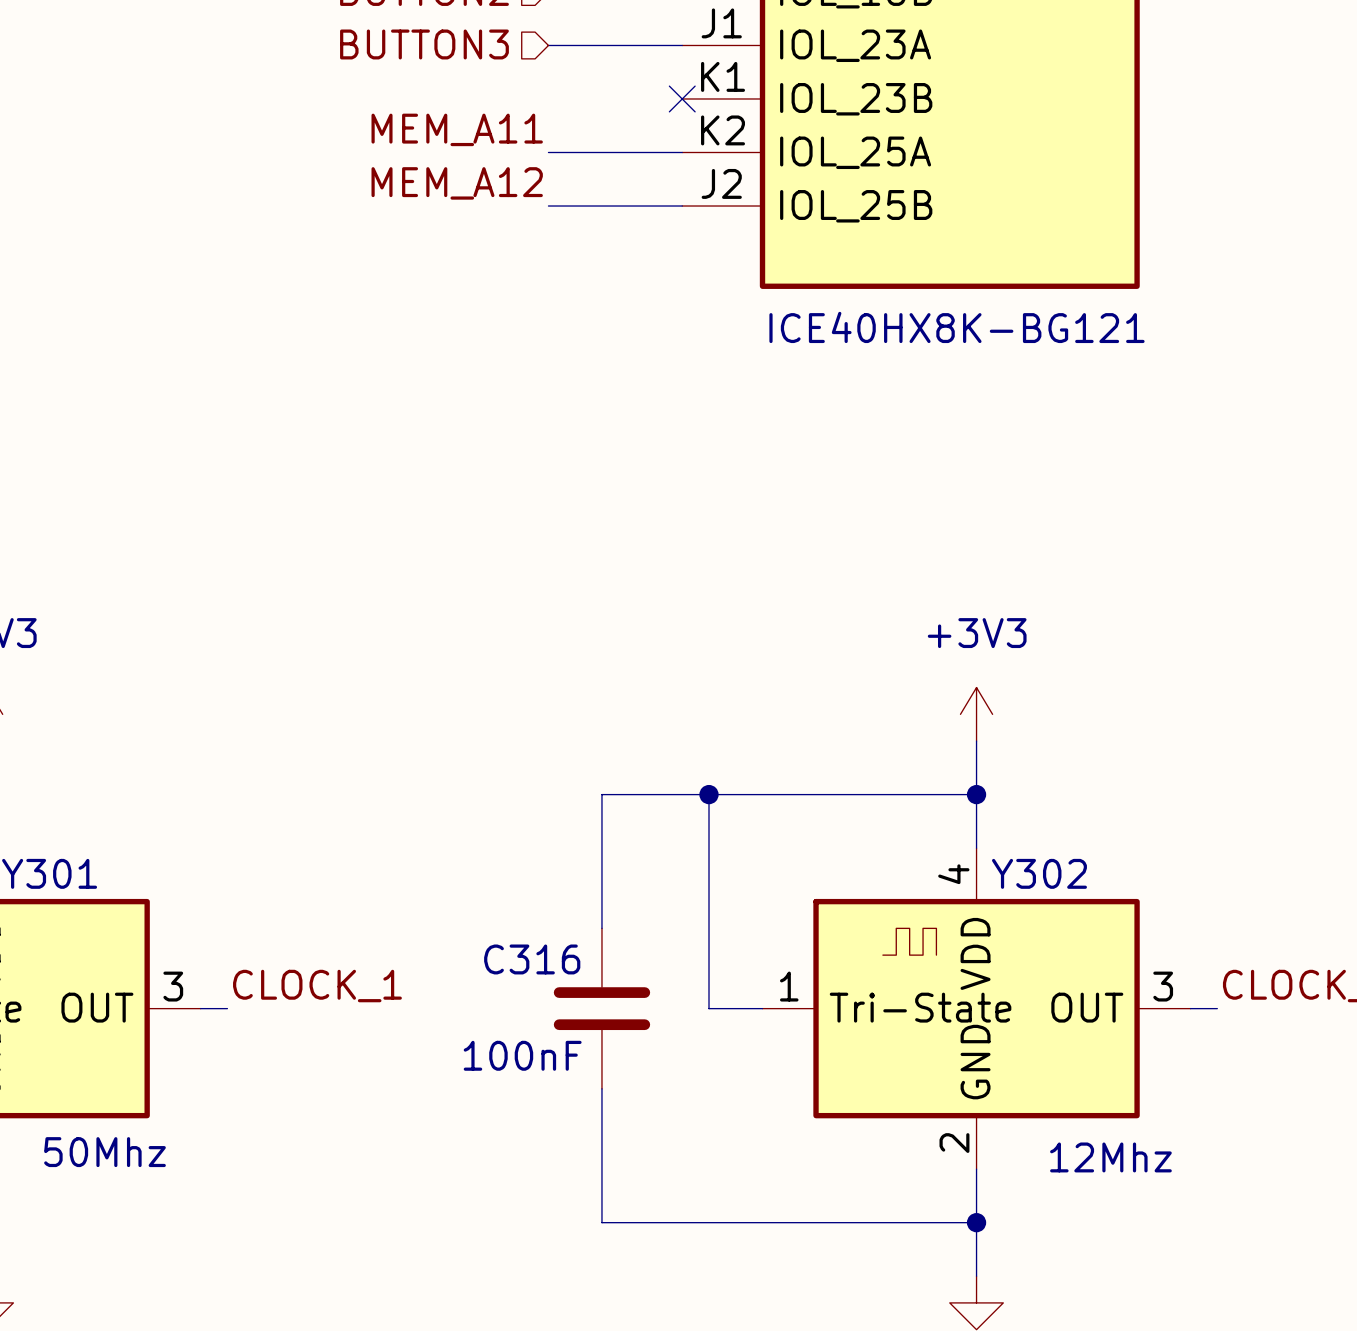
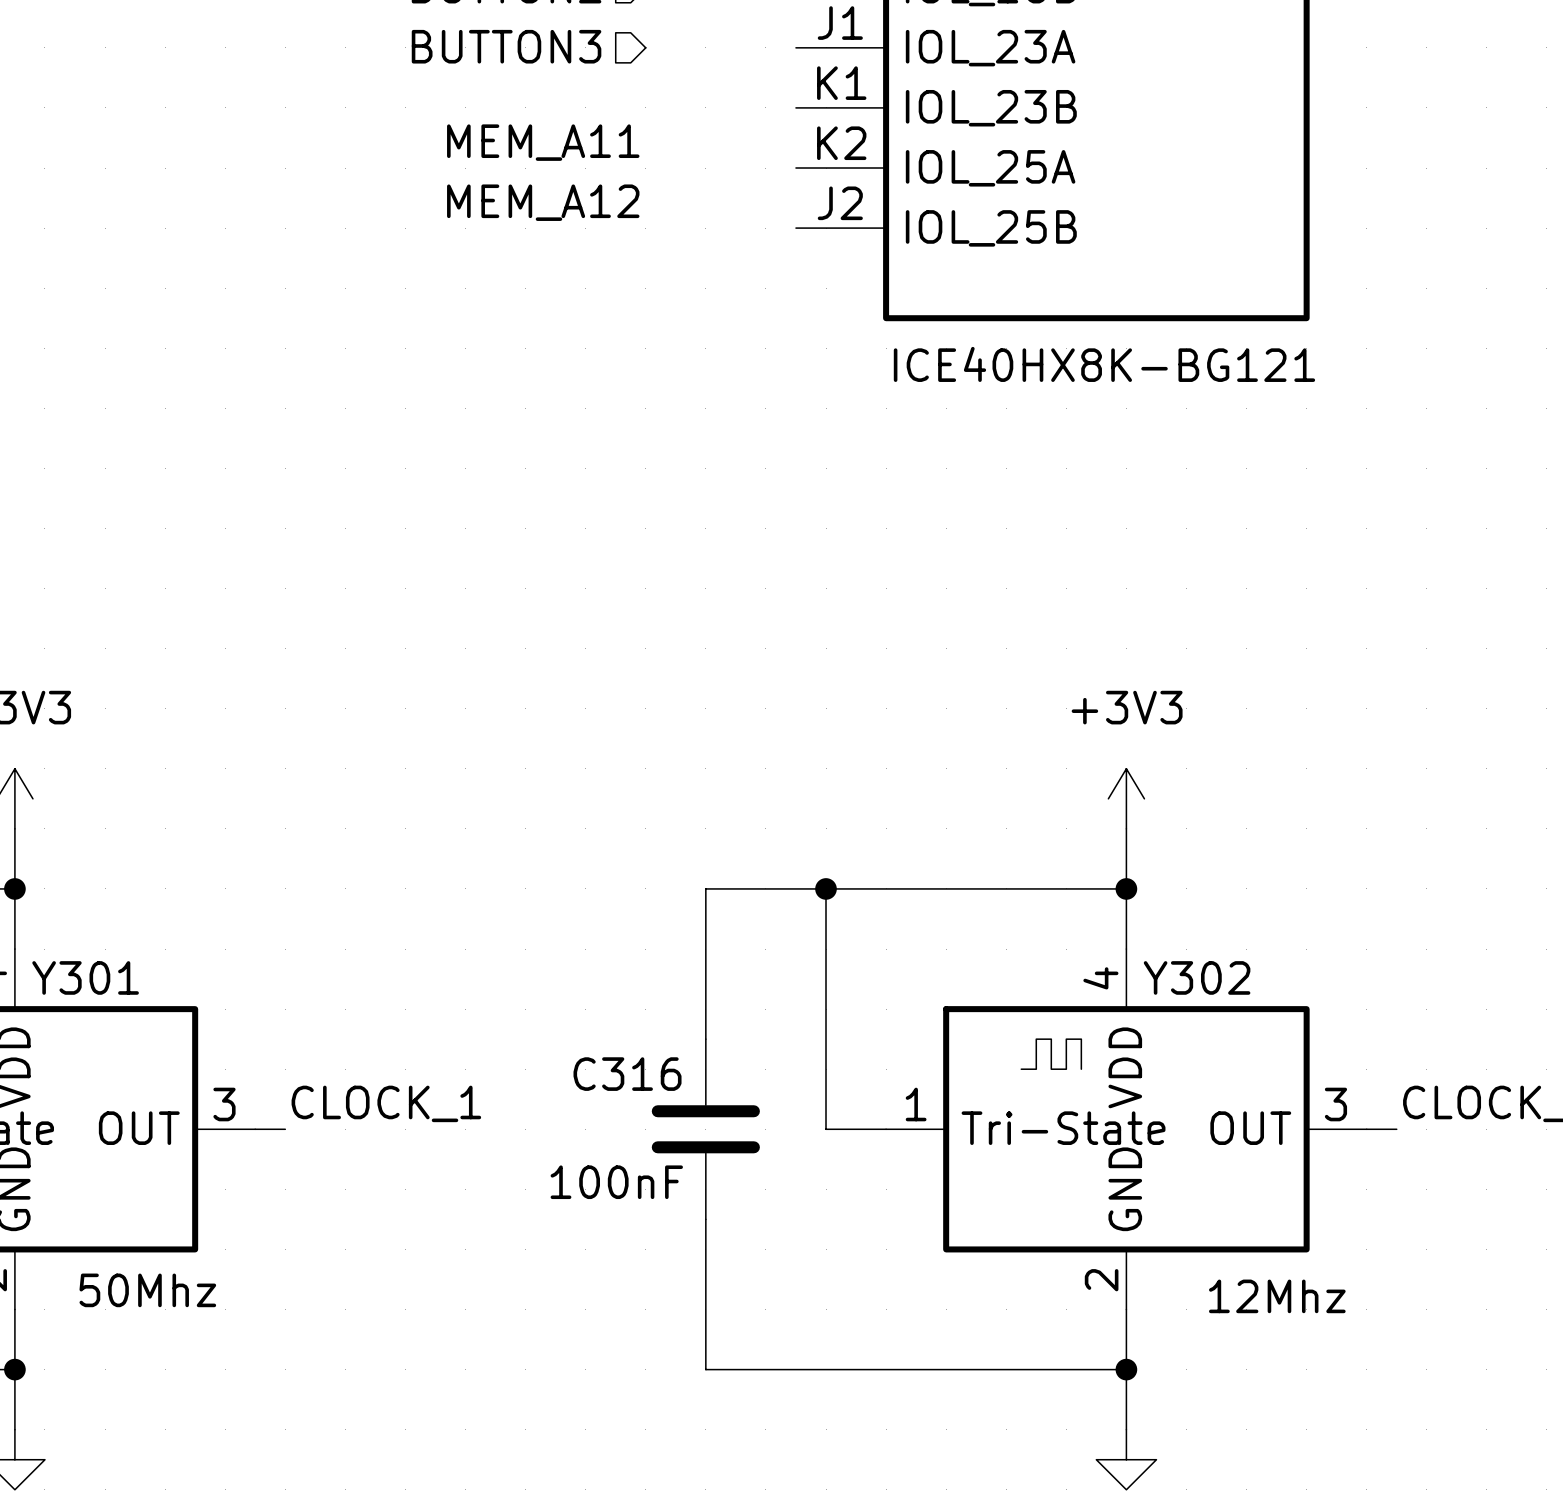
wire: (548, 45) (682, 45) -> none
no-connect mark: (682, 98) -> none
wire: (548, 152) (682, 152) -> none
wire: (548, 206) (682, 206) -> none

